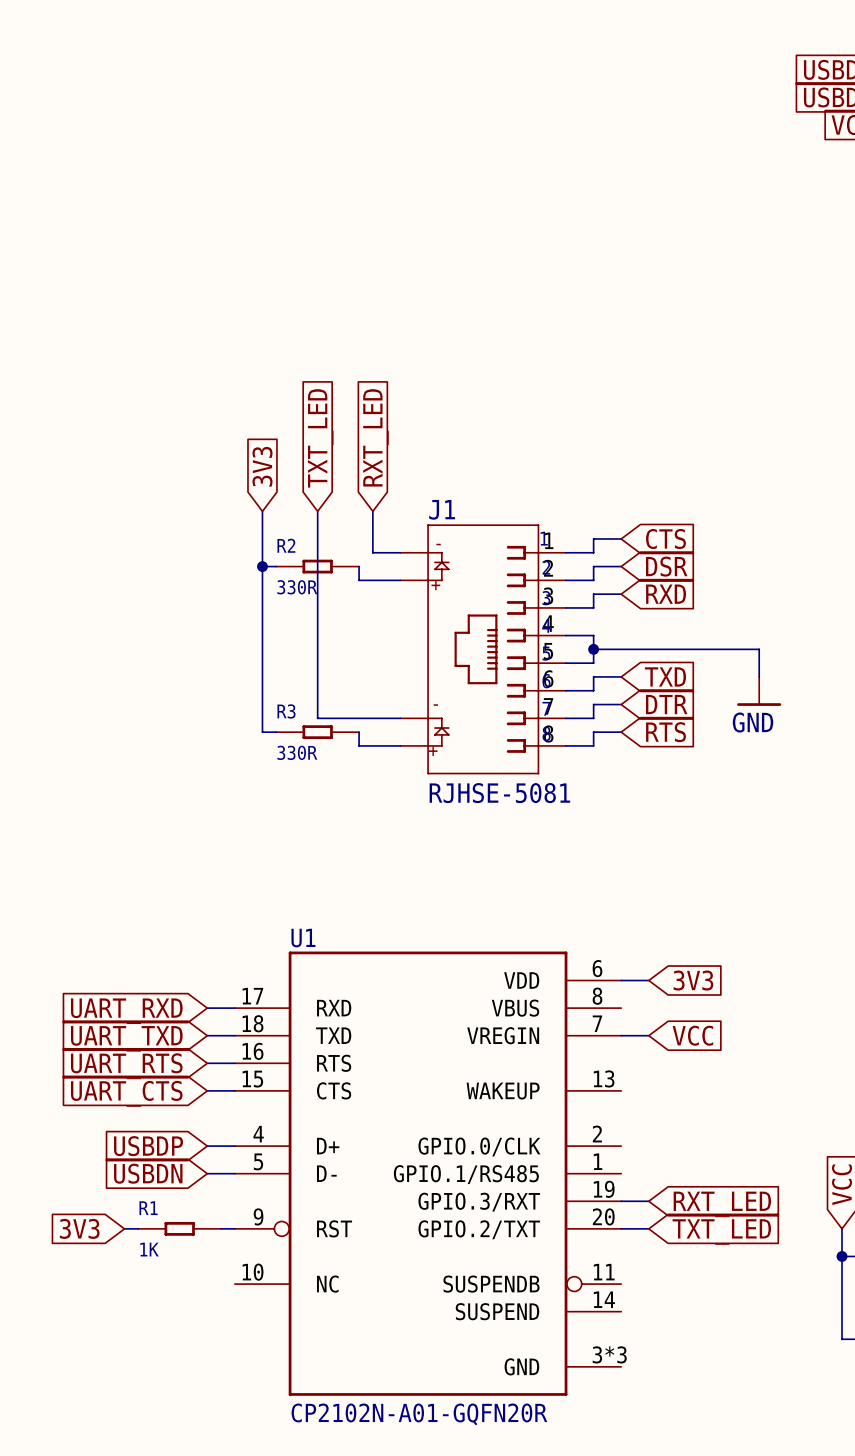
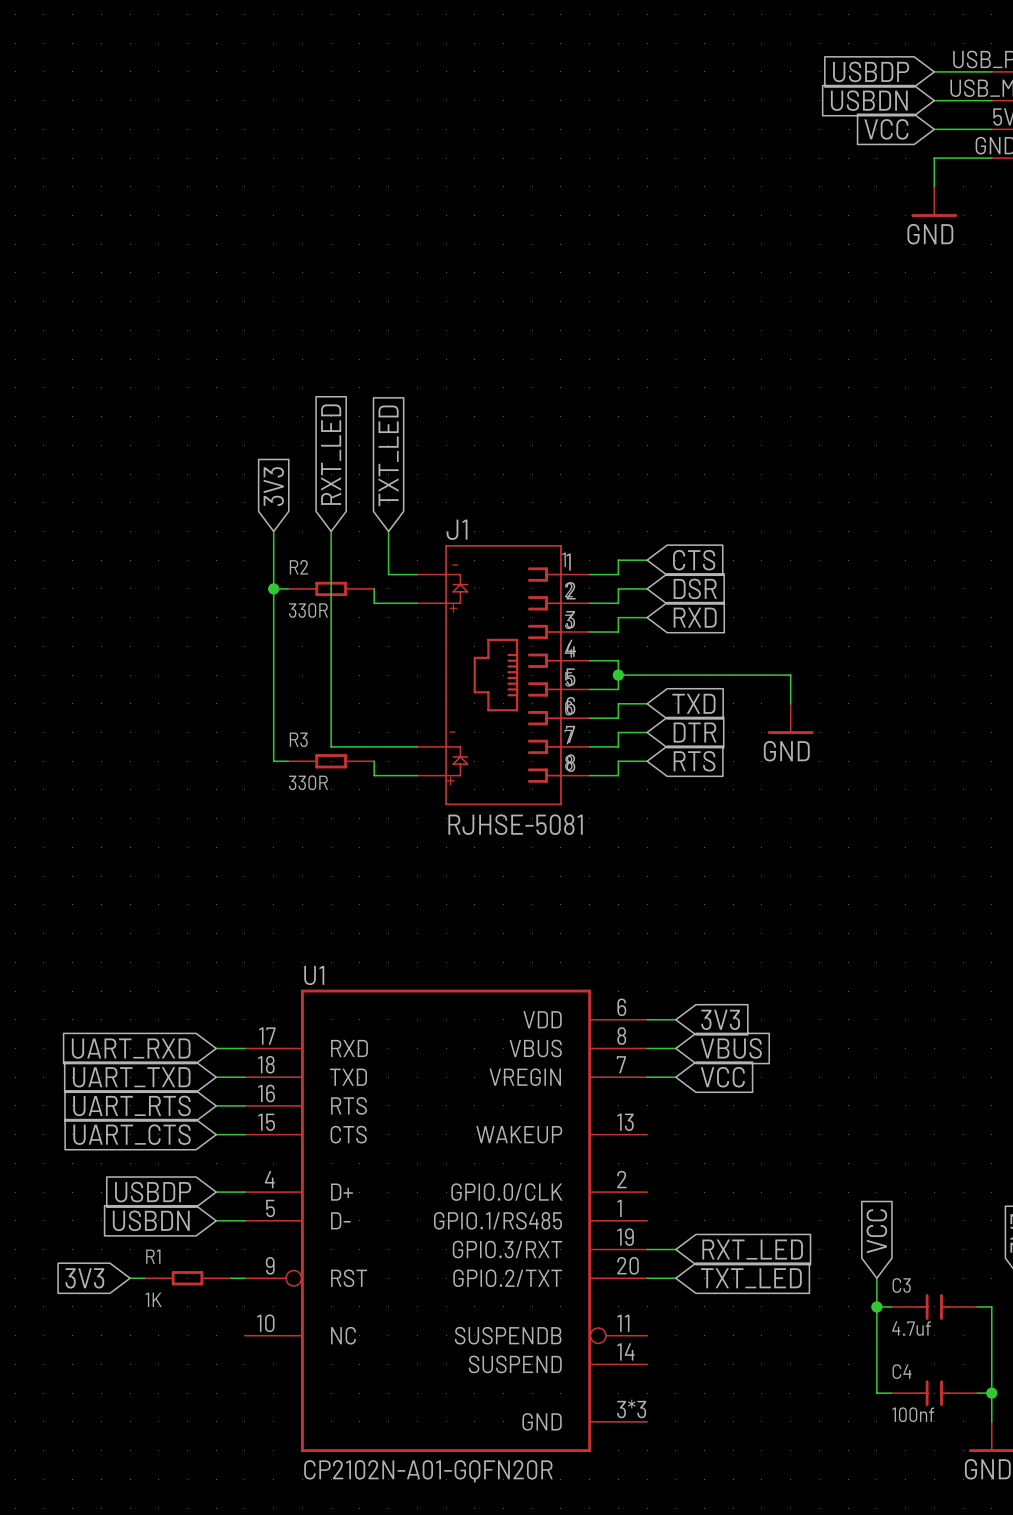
global label: RXT_LED (375, 437) -> TXT_LED (388, 455)
global label: TXT_LED (320, 438) -> RXT_LED (331, 454)
wire: none -> (647, 1048) (675, 1048)
global label: none -> VBUS (731, 1048)

